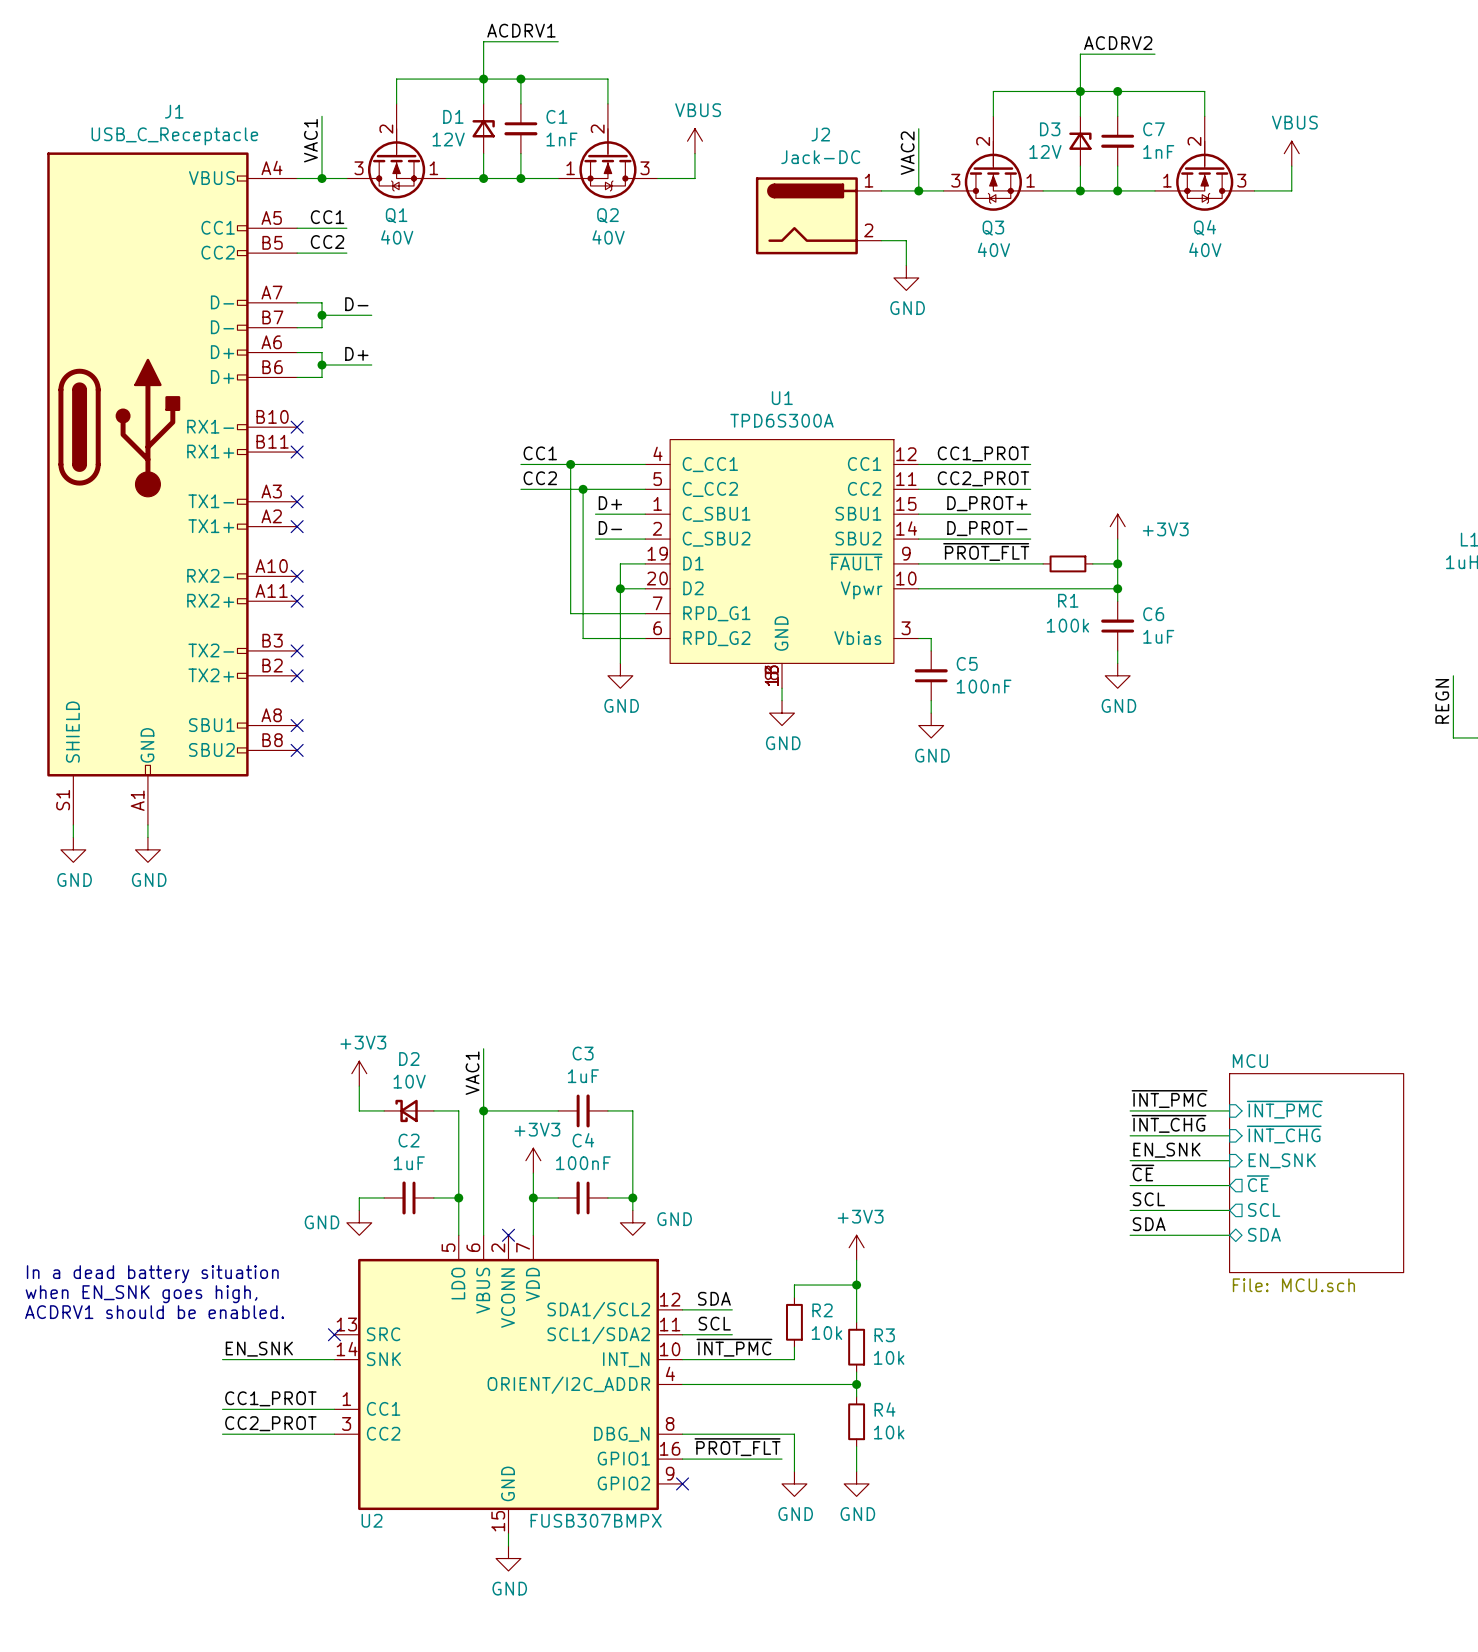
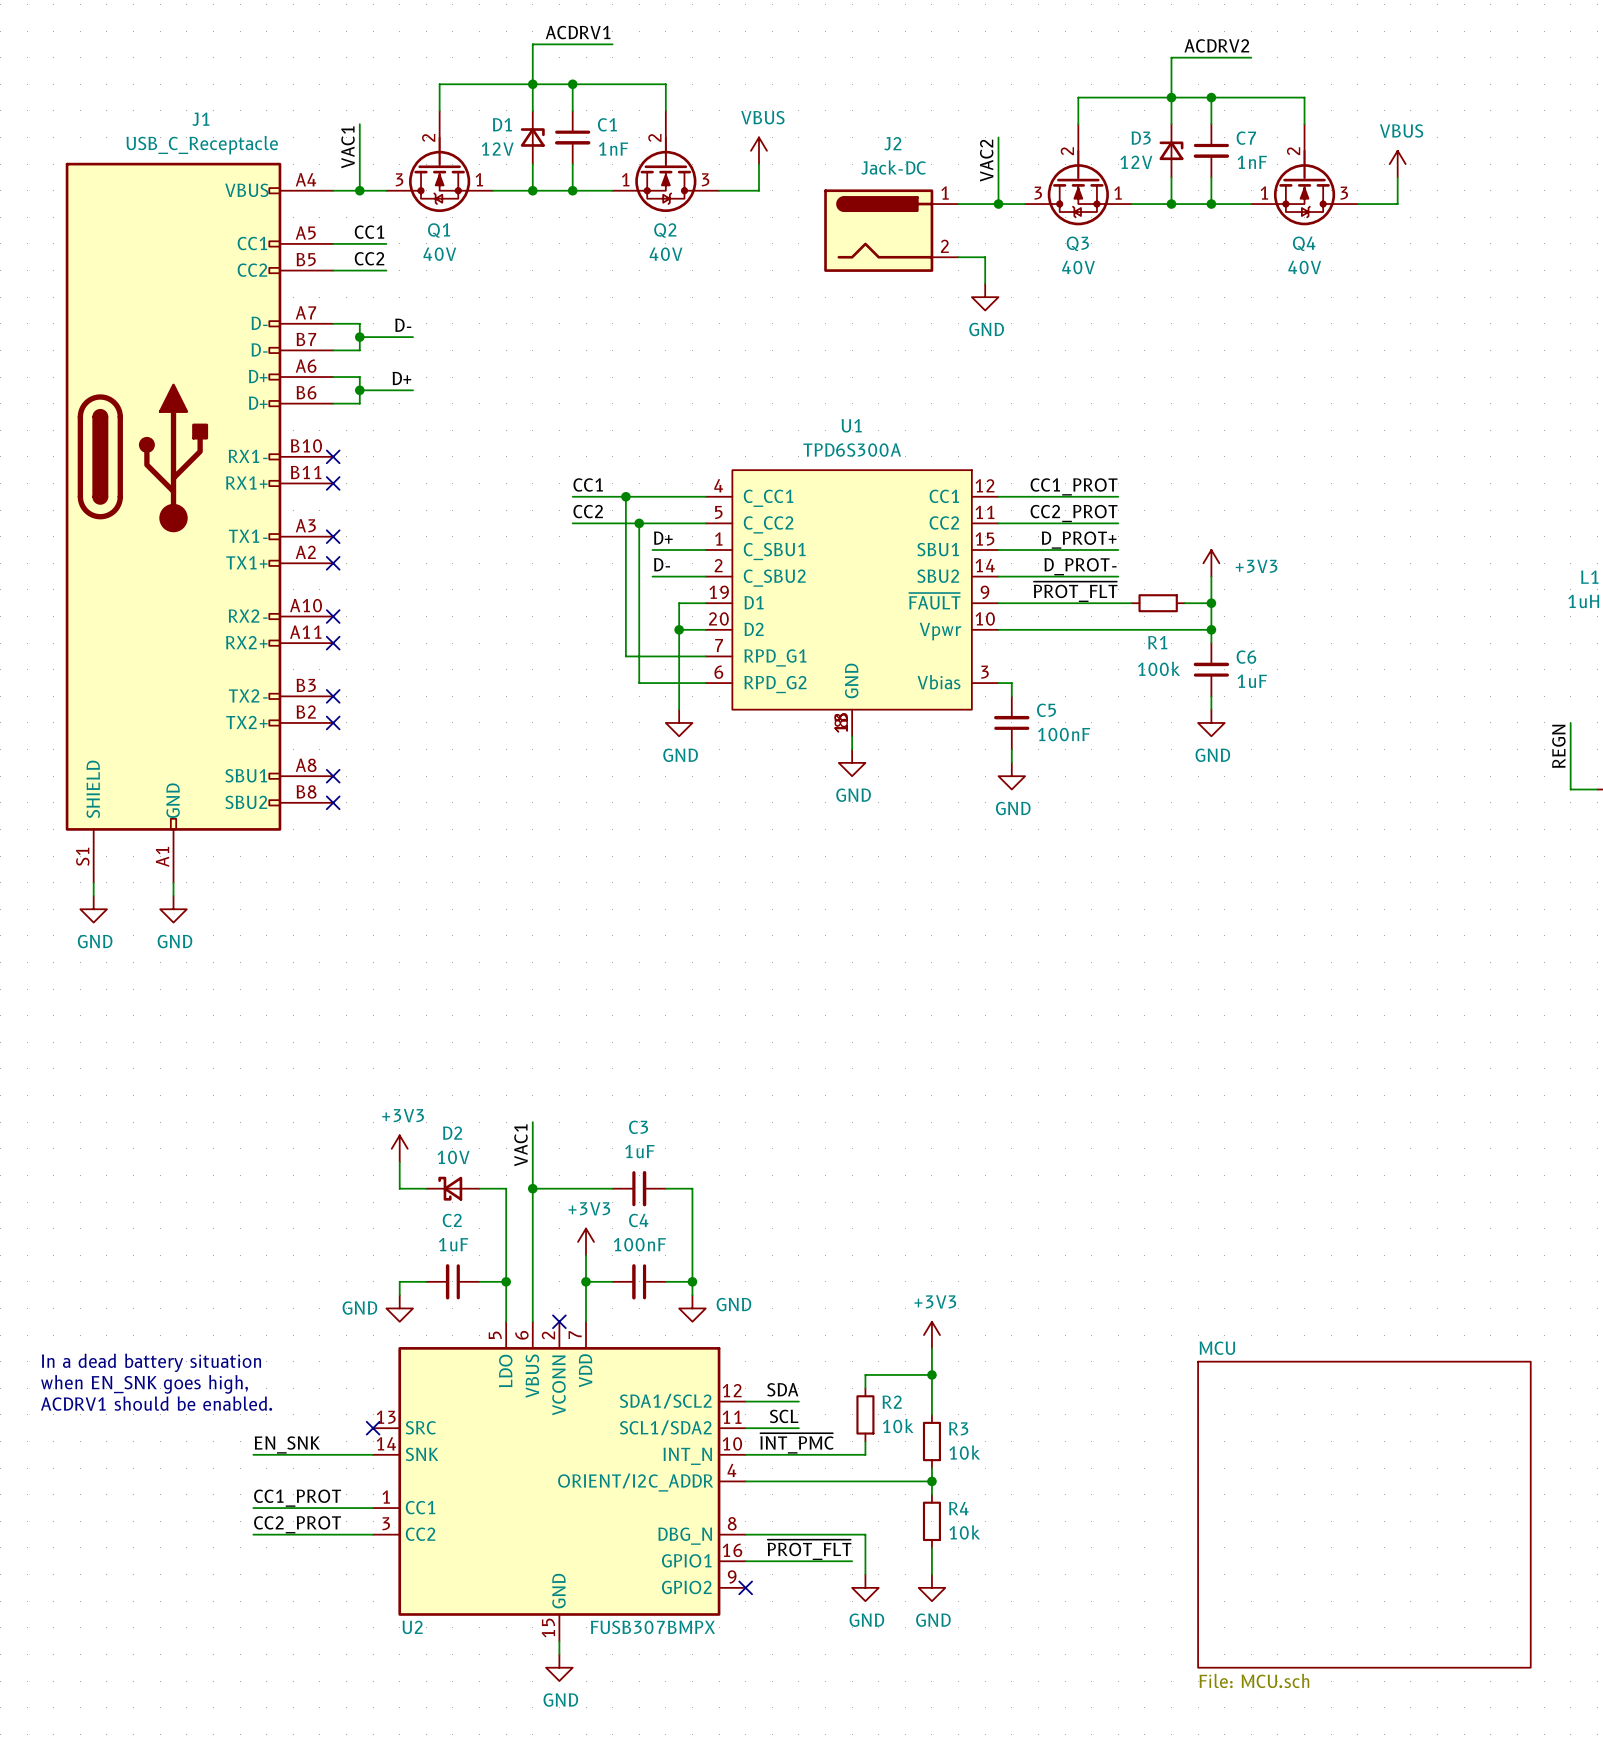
label: ~{INT_PMC} (1169, 1099) -> none
sheet pin: ~{INT_PMC} (1284, 1109) -> none
wire: (1130, 1110) (1229, 1110) -> none
label: ~{INT_CHG} (1169, 1123) -> none
sheet pin: ~{INT_CHG} (1284, 1134) -> none
wire: (1130, 1135) (1229, 1135) -> none
label: EN_SNK (1166, 1150) -> none
wire: (1130, 1160) (1229, 1160) -> none
sheet pin: EN_SNK (1282, 1160) -> none
label: ~{CE} (1142, 1173) -> none
sheet MCU: File: MCU.sch (1316, 1173) -> none
sheet pin: ~{CE} (1258, 1183) -> none
wire: (1130, 1185) (1229, 1185) -> none
label: SCL (1148, 1199) -> none
sheet pin: SCL (1264, 1209) -> none
wire: (1130, 1210) (1229, 1210) -> none
label: SDA (1149, 1224) -> none
sheet pin: SDA (1264, 1234) -> none
wire: (1130, 1235) (1229, 1235) -> none
sheet MCU: none -> File: MCU.sch (1364, 1514)

